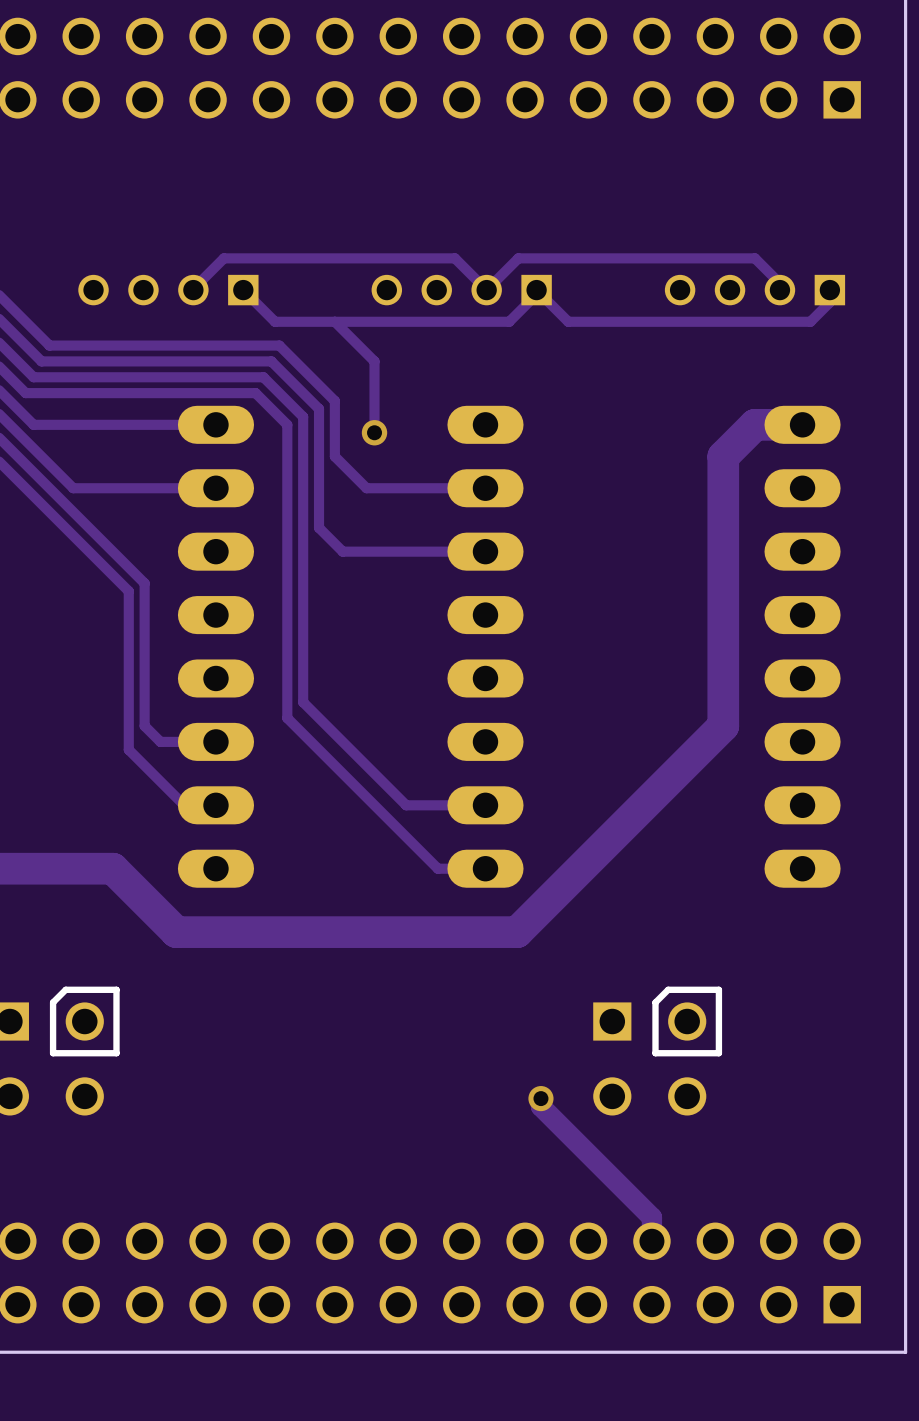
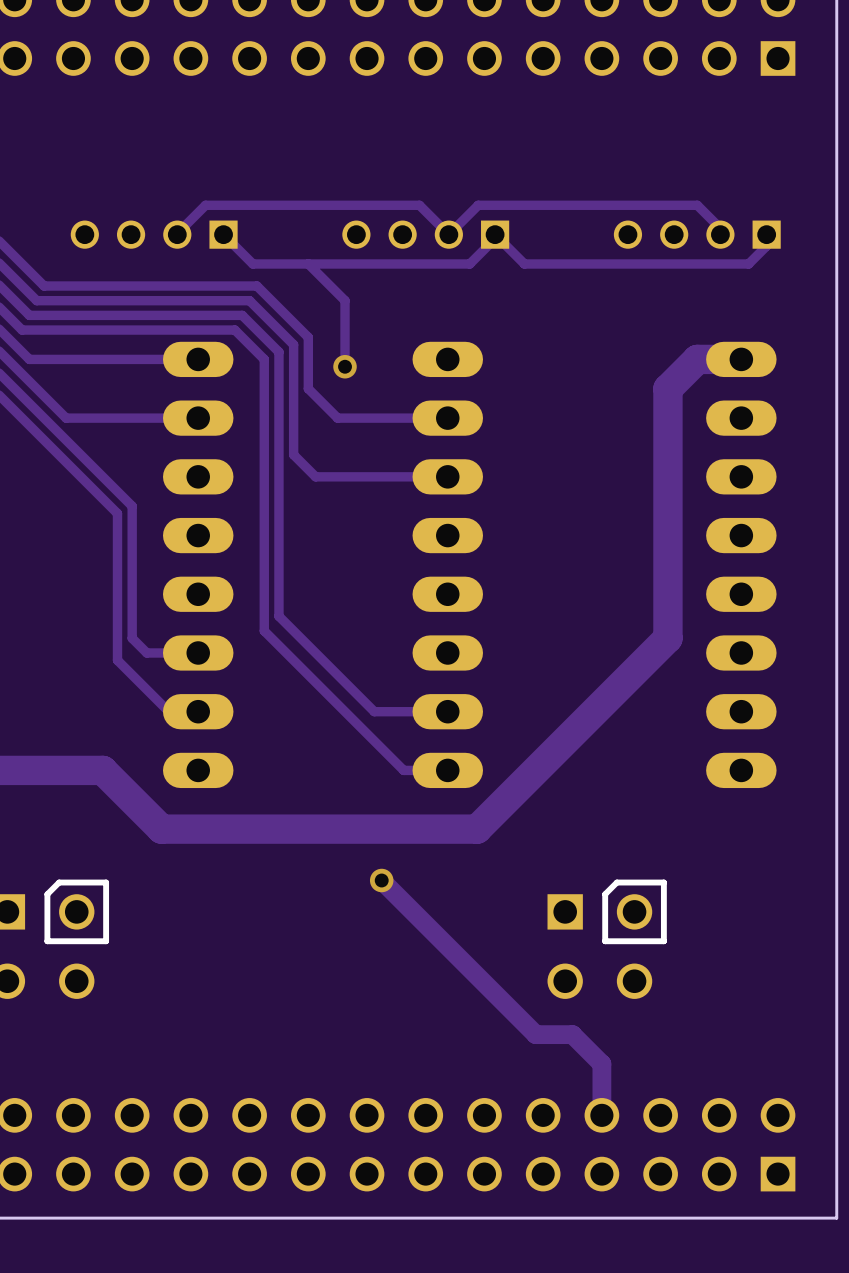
via: none -> (381, 880)
track: (540, 1098) (540, 1106) (651, 1217) -> (381, 880) (535, 1034) (572, 1034) (601, 1063) (601, 1093)
via: (540, 1098) -> none

